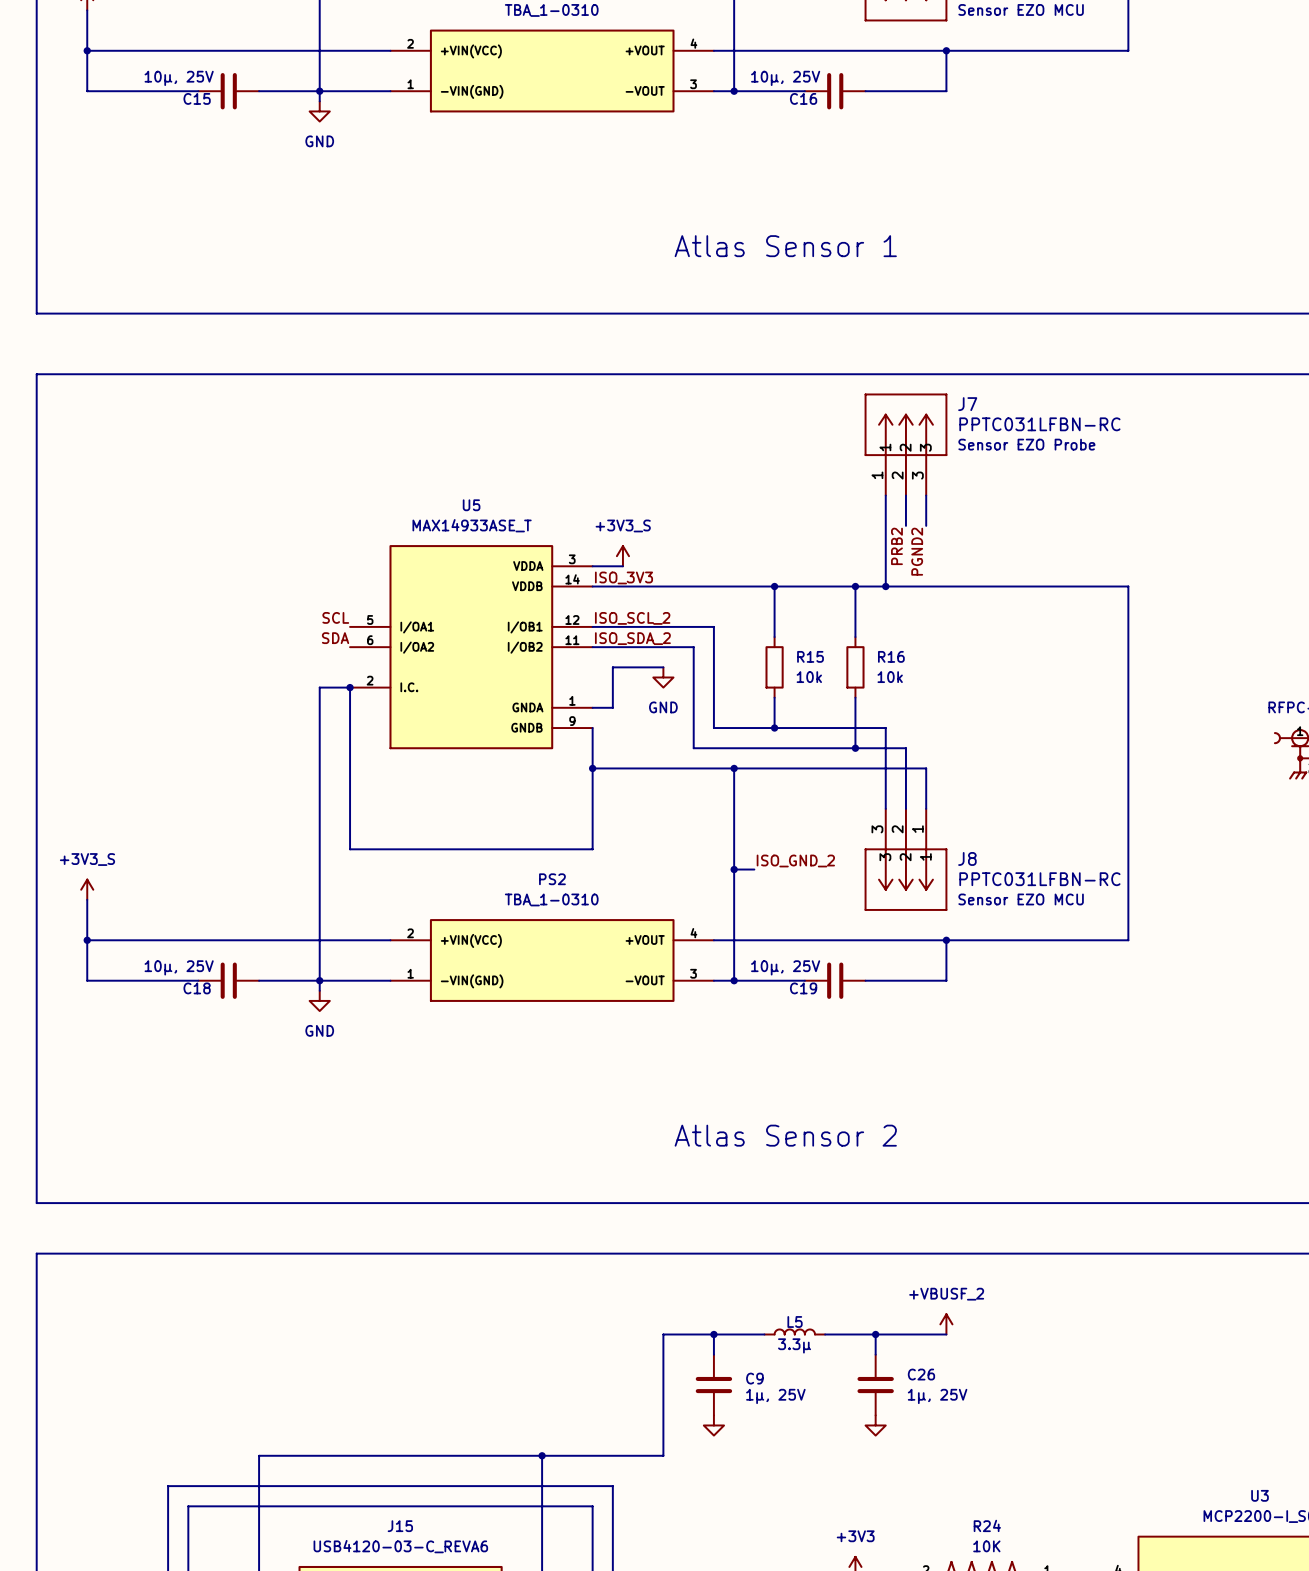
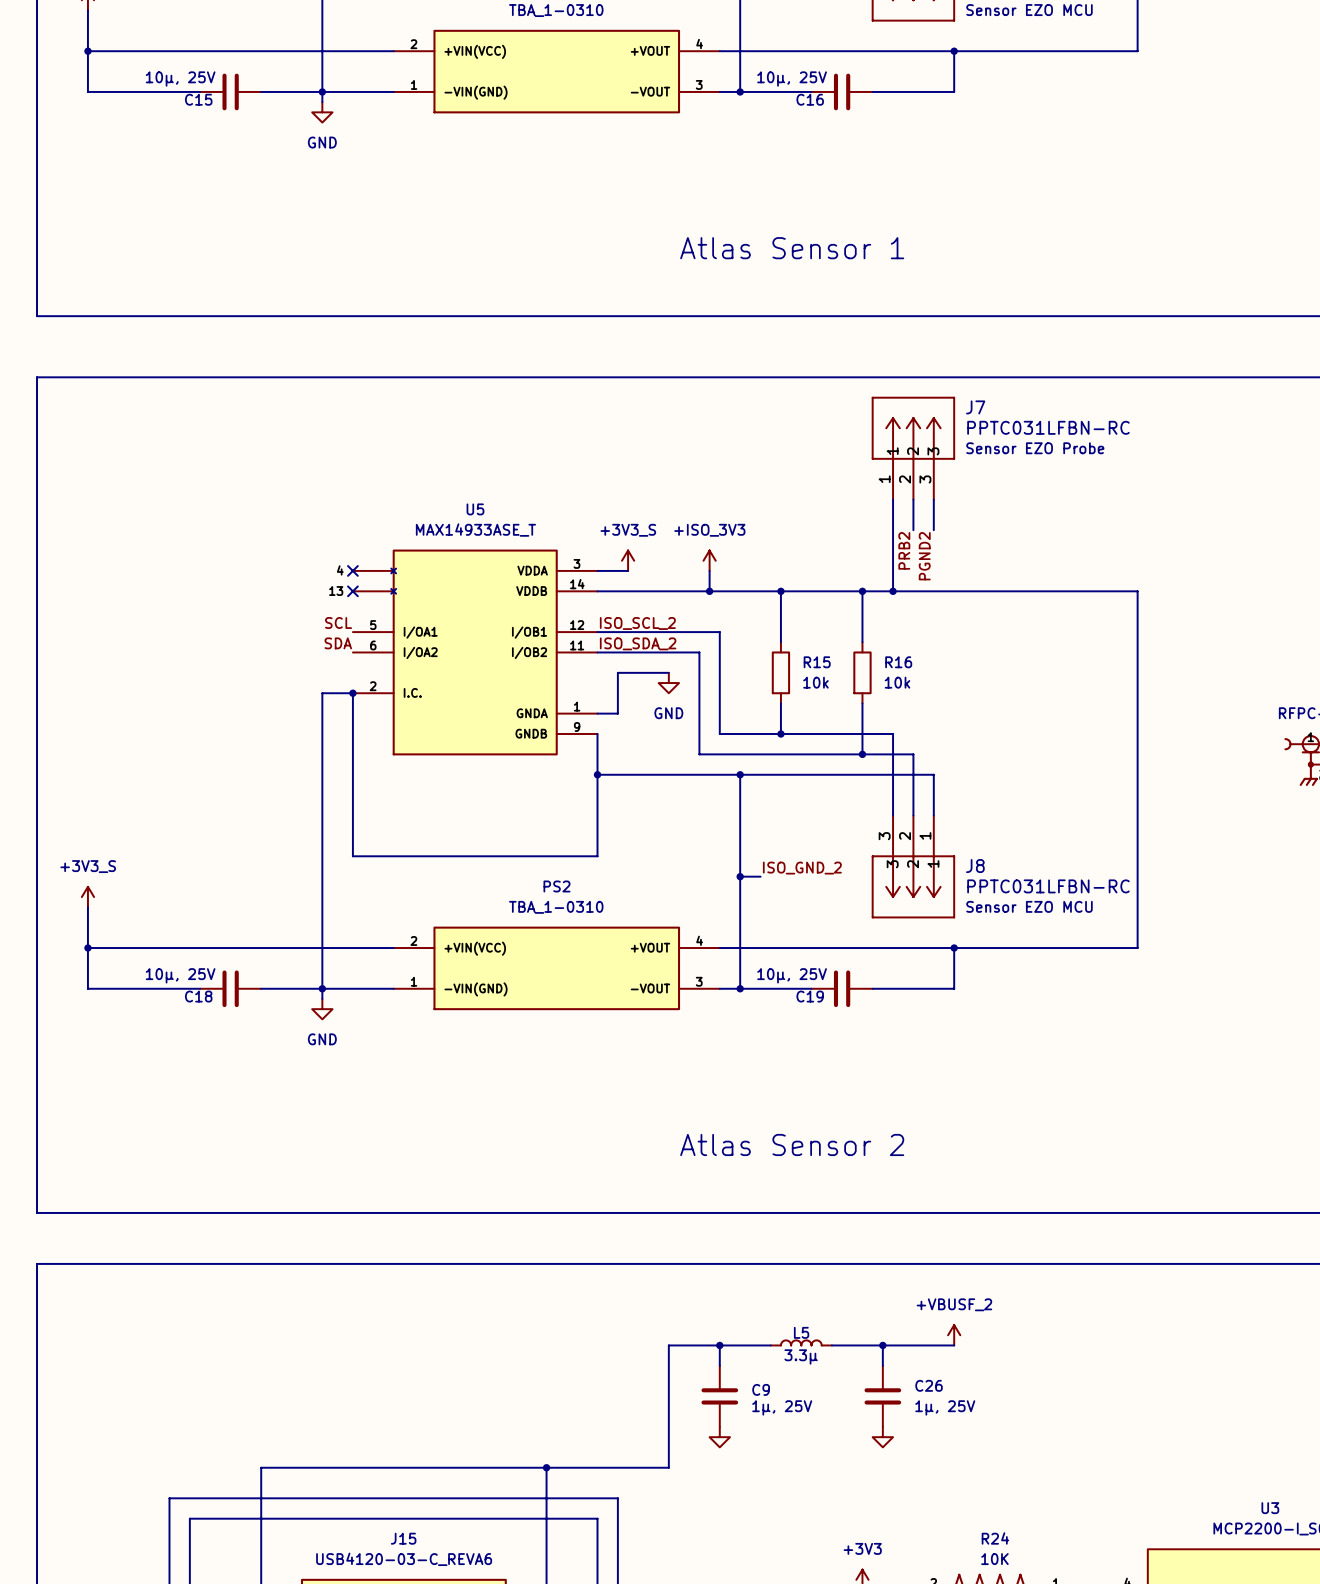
U5 symbol: [350, 545, 593, 750] -> [352, 549, 598, 756]
power symbol: none -> +ISO_3V3 (709, 560)
no-connect mark: none -> (352, 570)
wire: none -> (709, 570) (709, 591)
label: ISO_3V3 (624, 577) -> none
no-connect mark: none -> (352, 591)
junction: none -> (709, 591)

